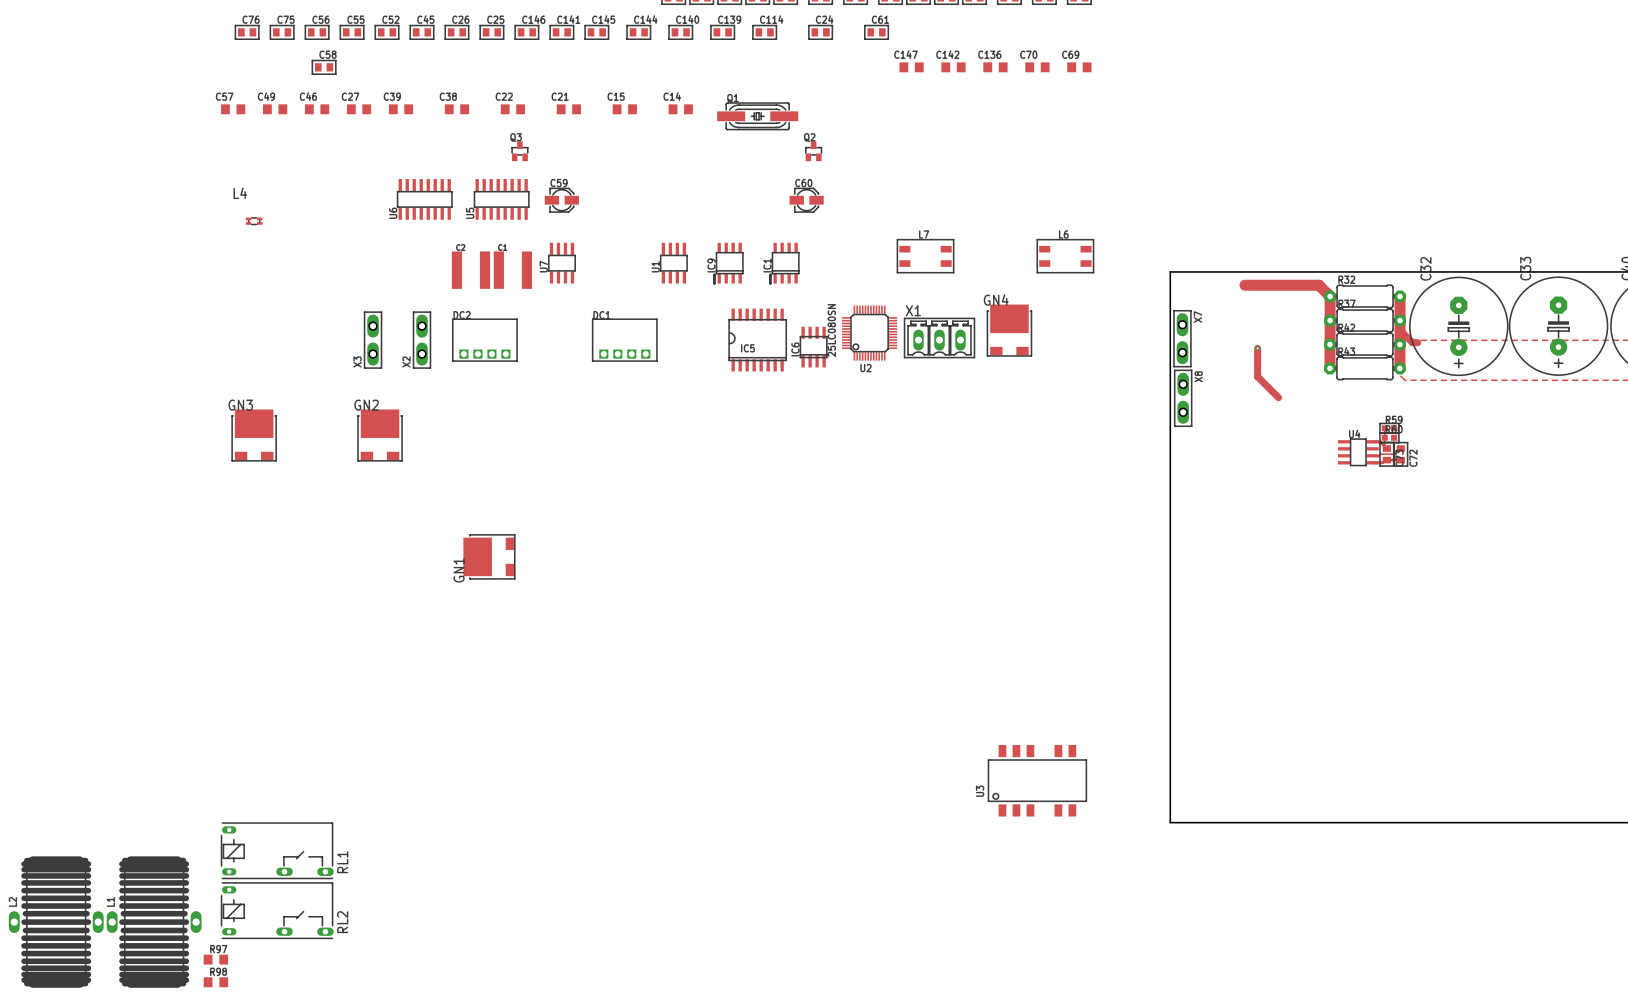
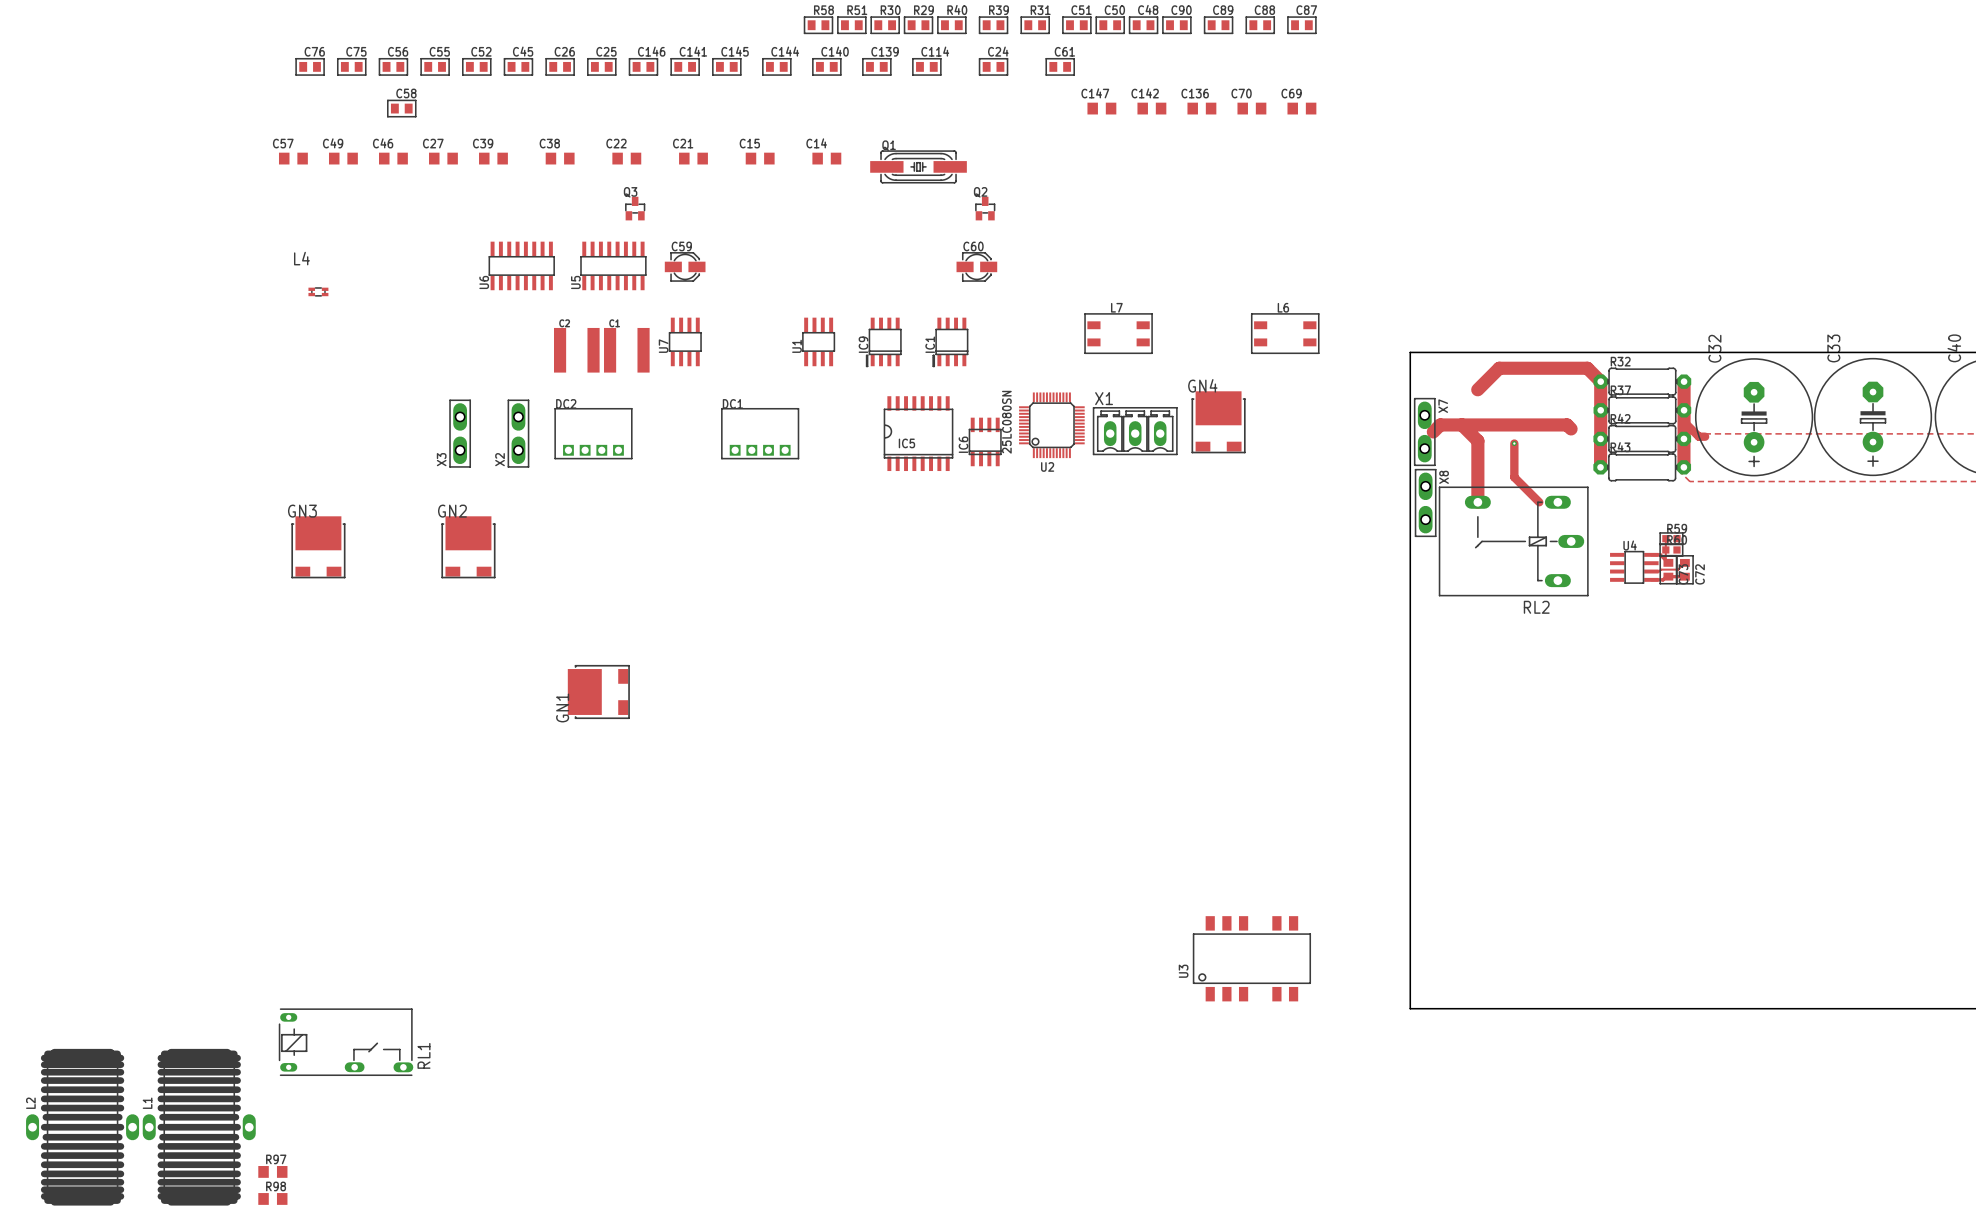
track: none -> (1499, 368) (1477, 389)
track: none -> (1461, 424) (1477, 440) (1477, 502)
track: none -> (1571, 428) (1567, 424) (1440, 424) (1433, 431)
RL2 footprint: [221, 882, 334, 939] -> [1439, 486, 1589, 597]
RL2 name position: RL2 (342, 922) -> RL2 (1536, 607)

